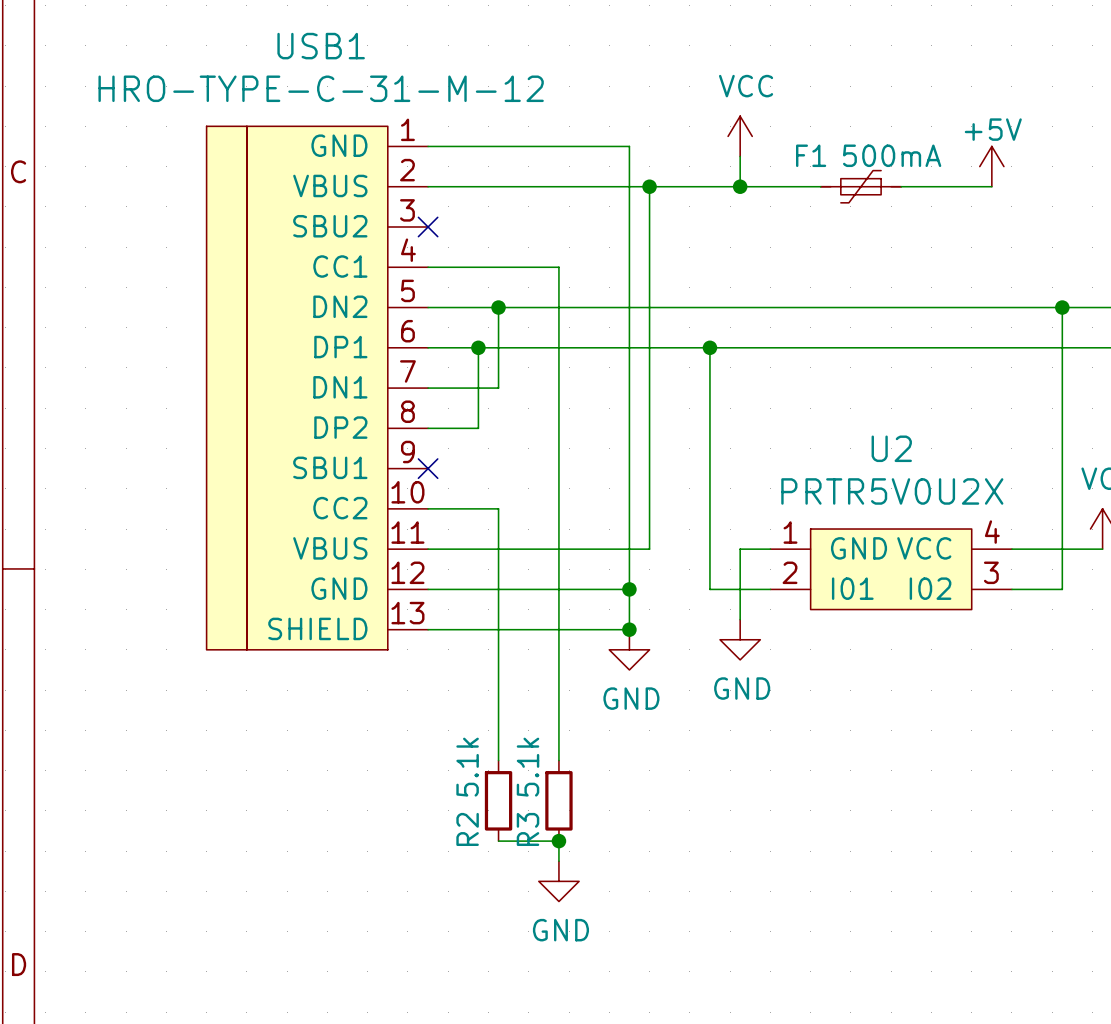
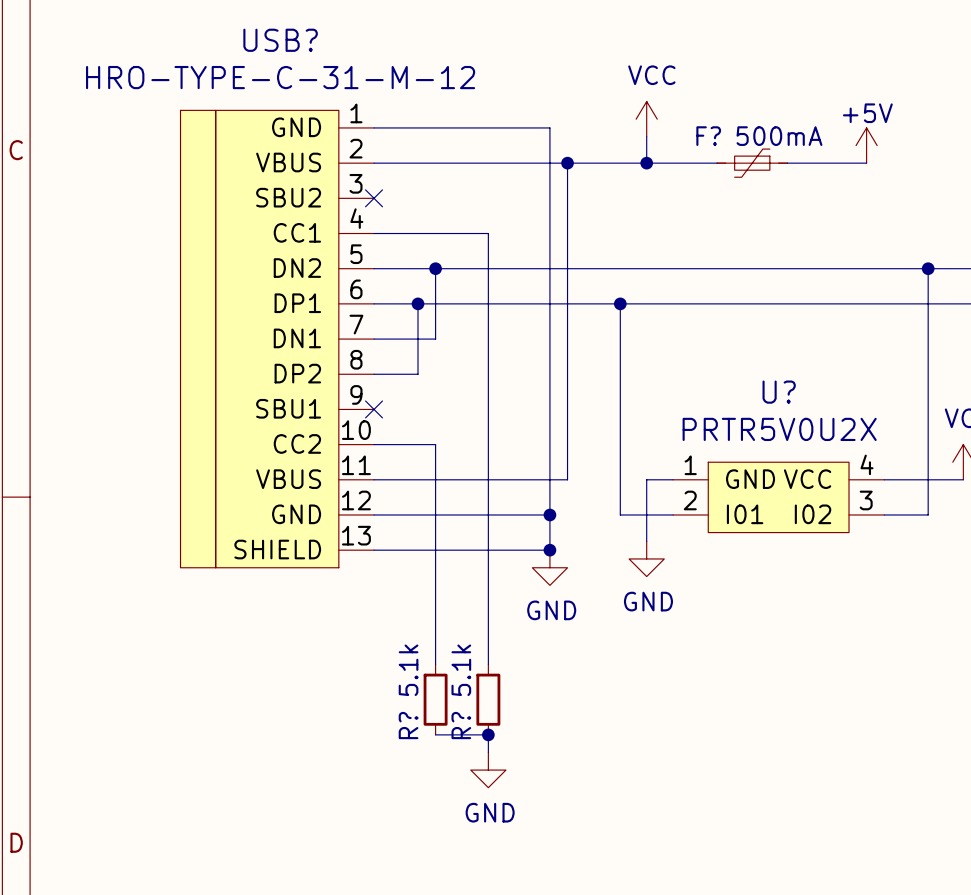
USB1 name: USB1 (321, 46) -> USB? (280, 40)
F1 name: F1 (811, 155) -> F? (708, 136)
U2 name: U2 (891, 448) -> U? (779, 392)
R2 name: R2 (467, 829) -> R? (408, 725)
R3 name: R3 (528, 829) -> R? (461, 725)

